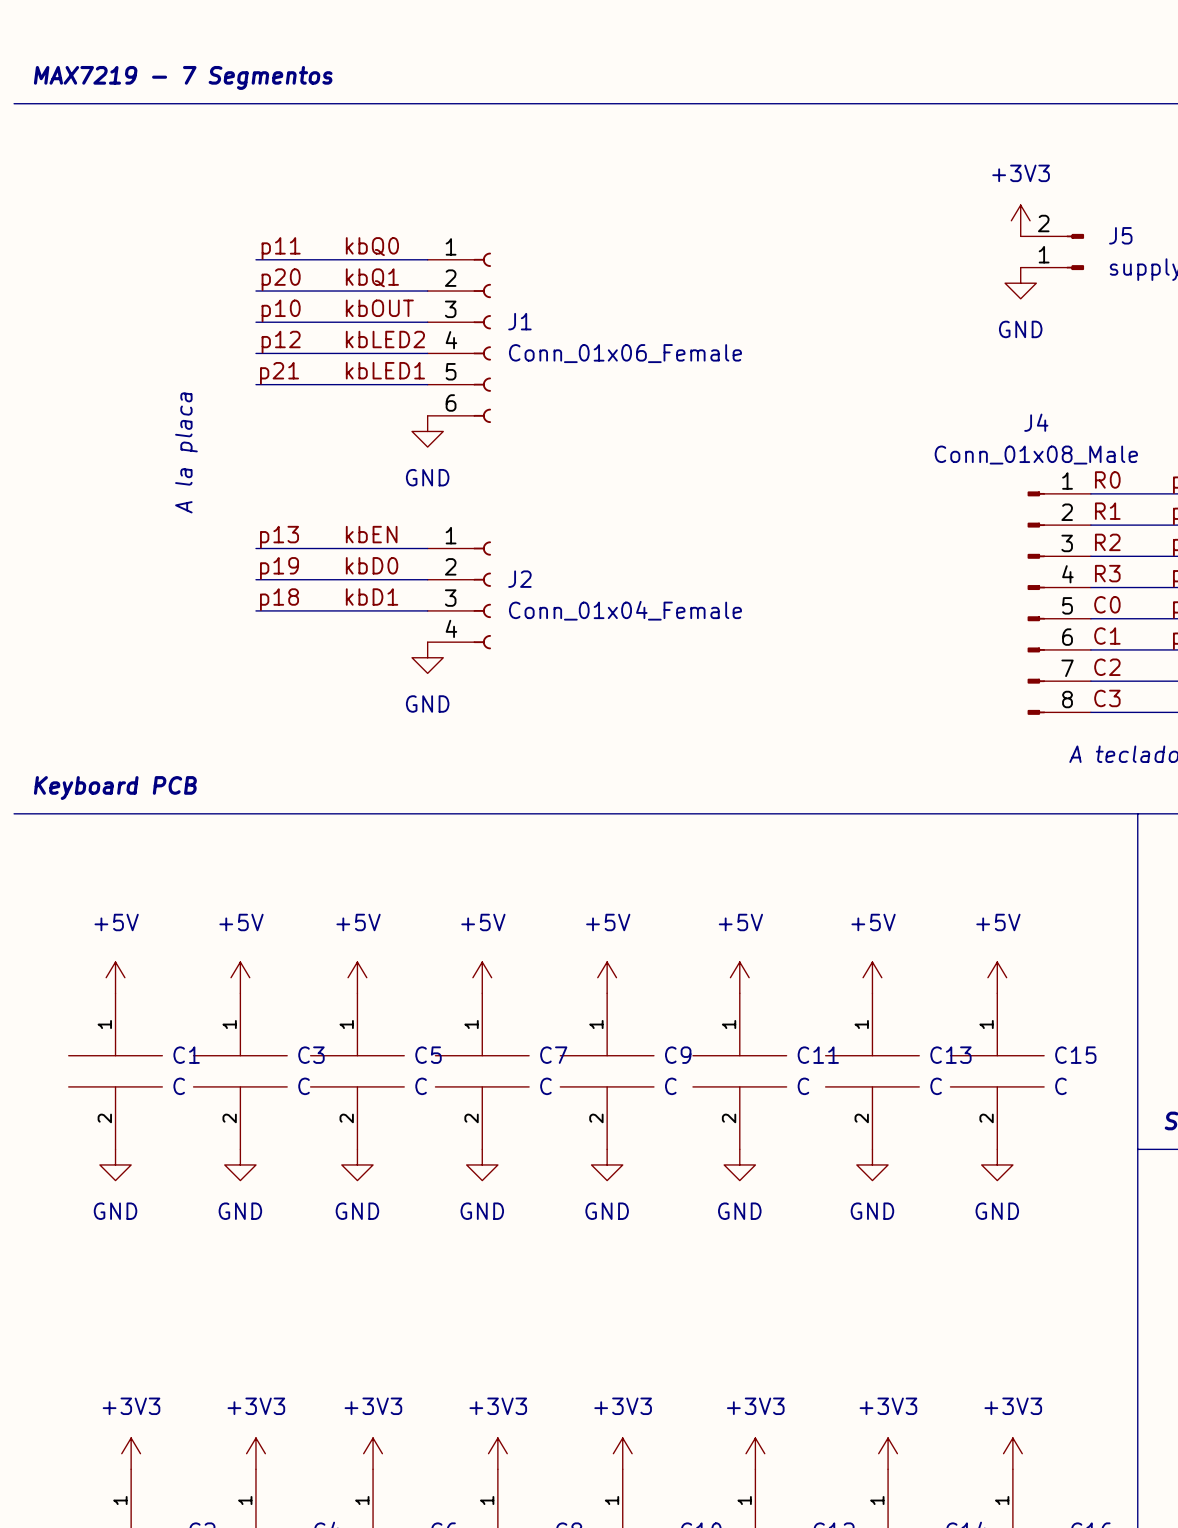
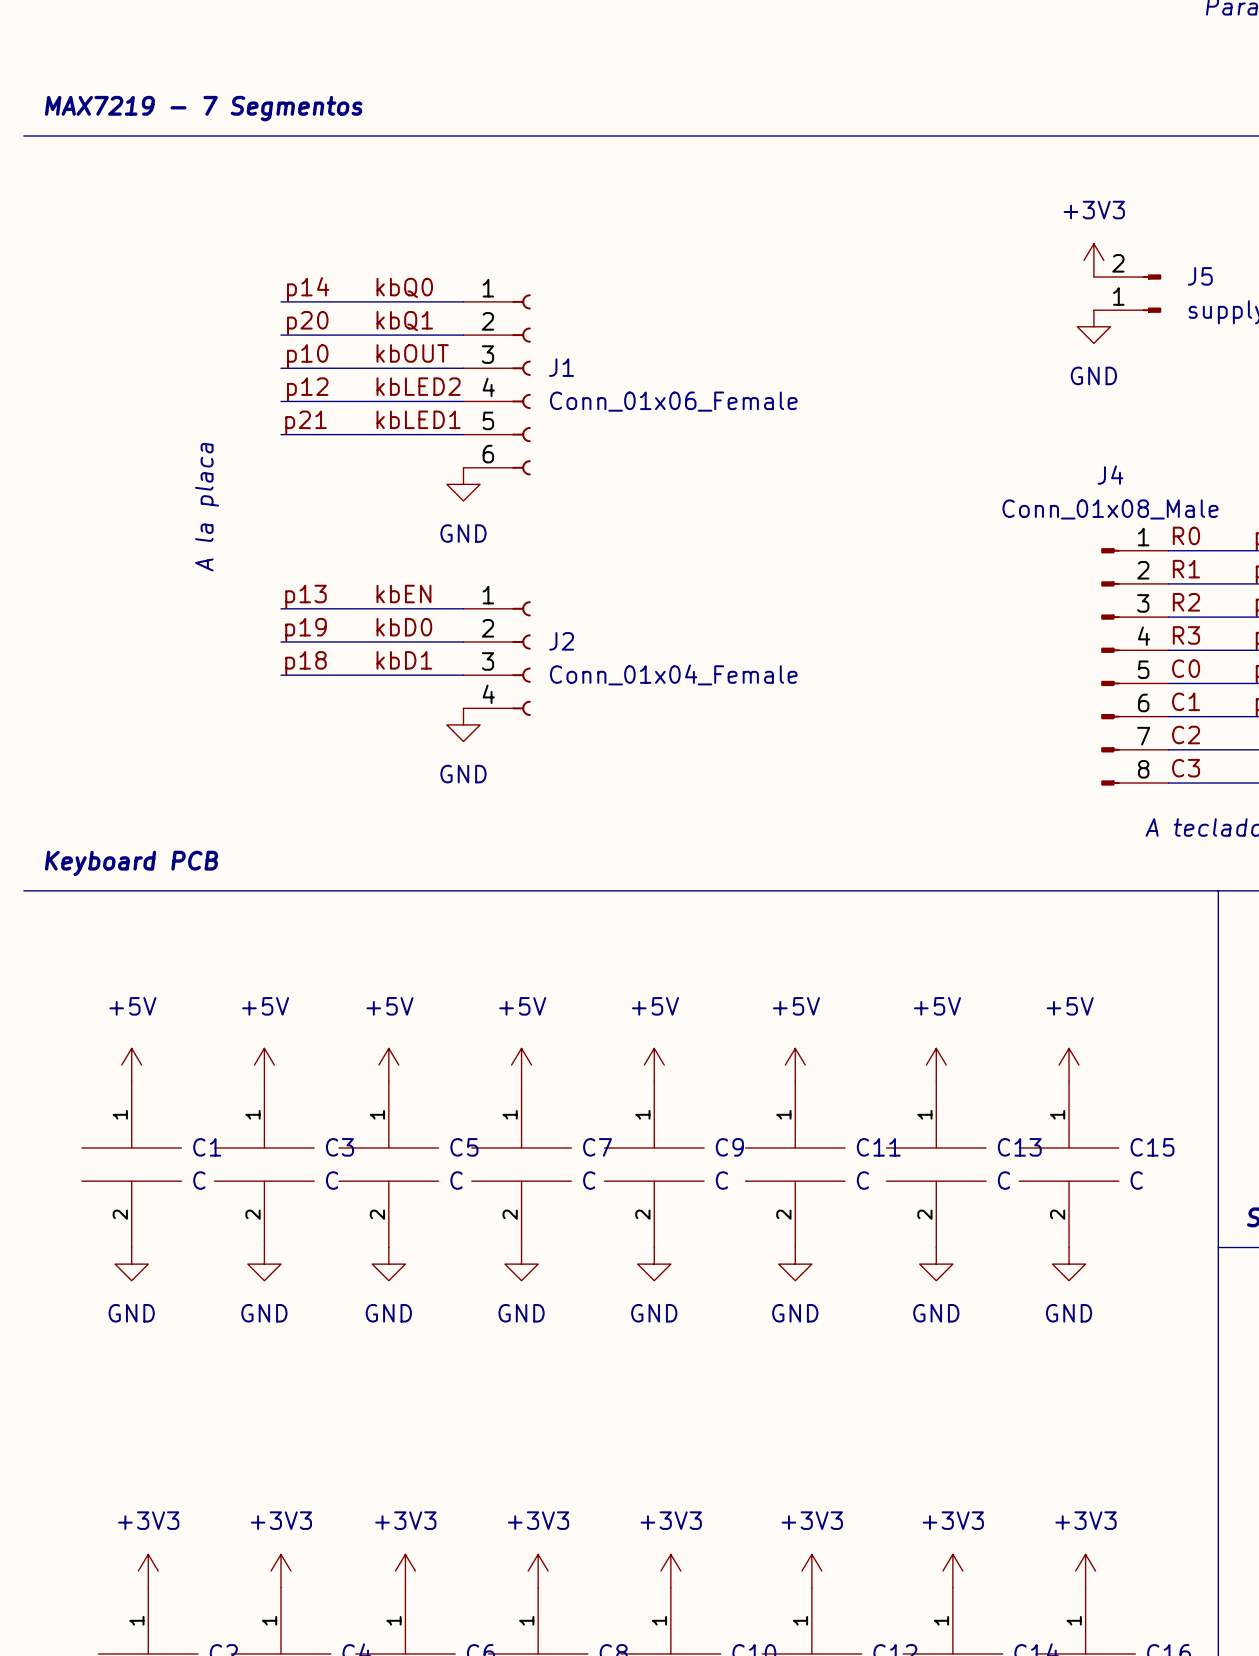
label: p11 (281, 248) -> p14 (308, 289)

